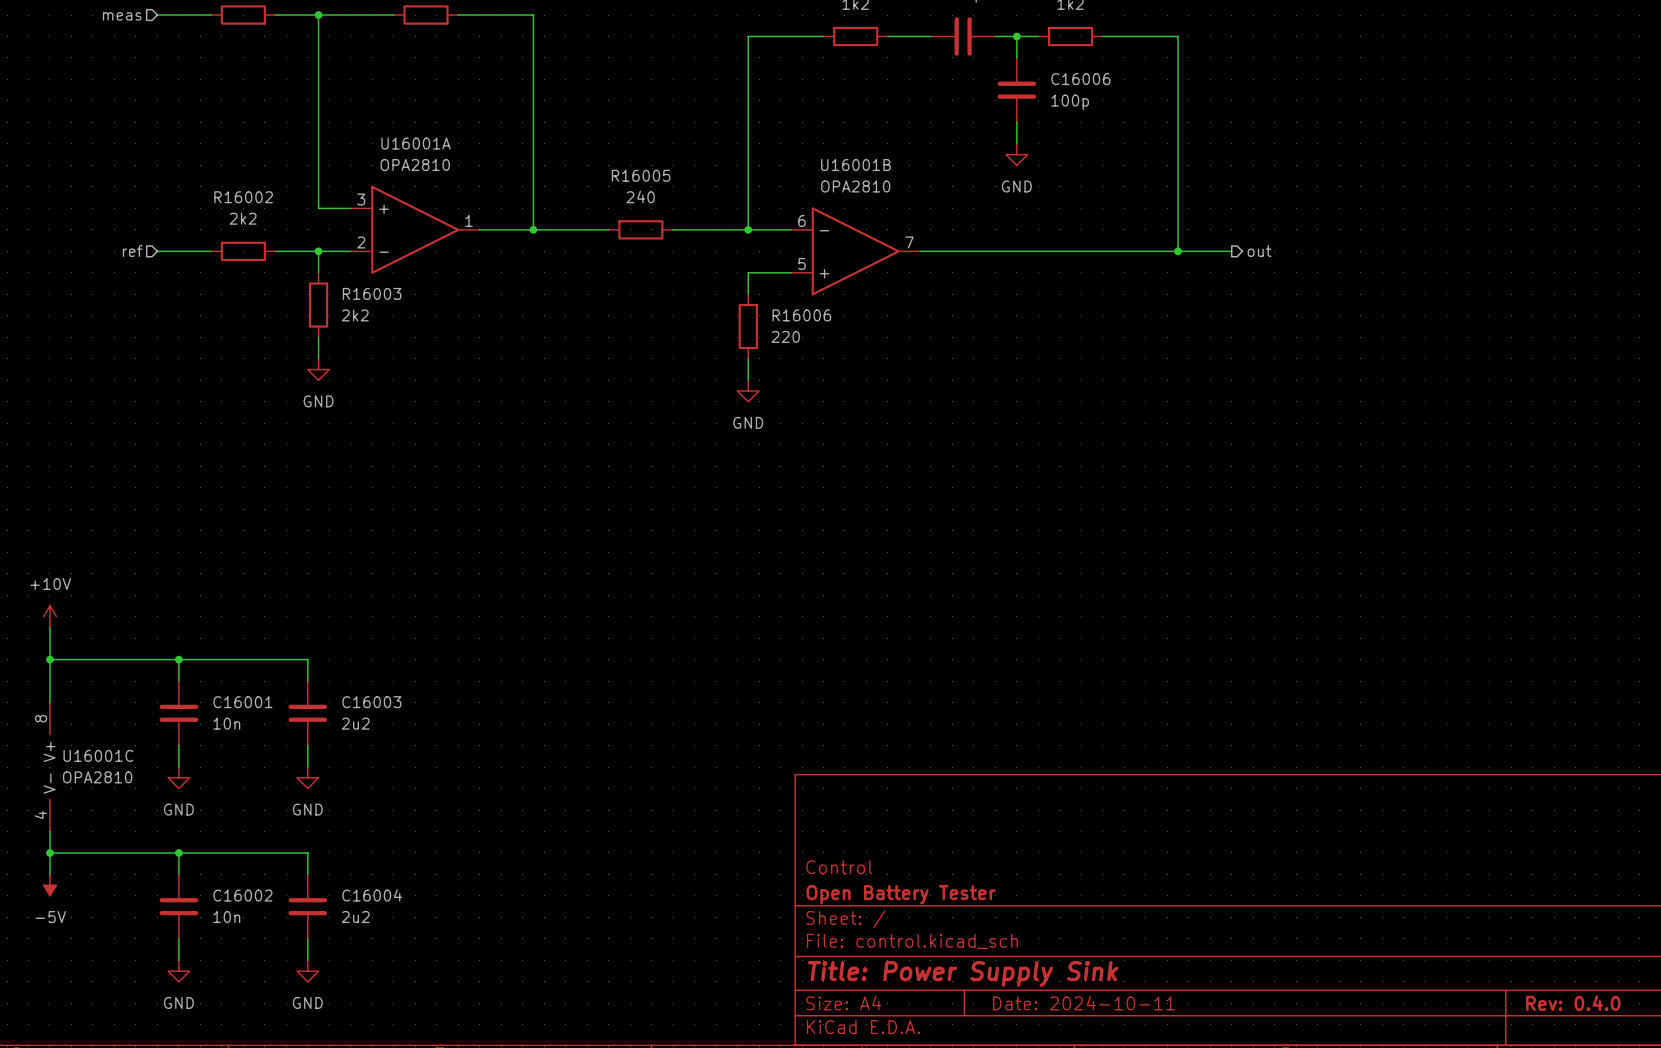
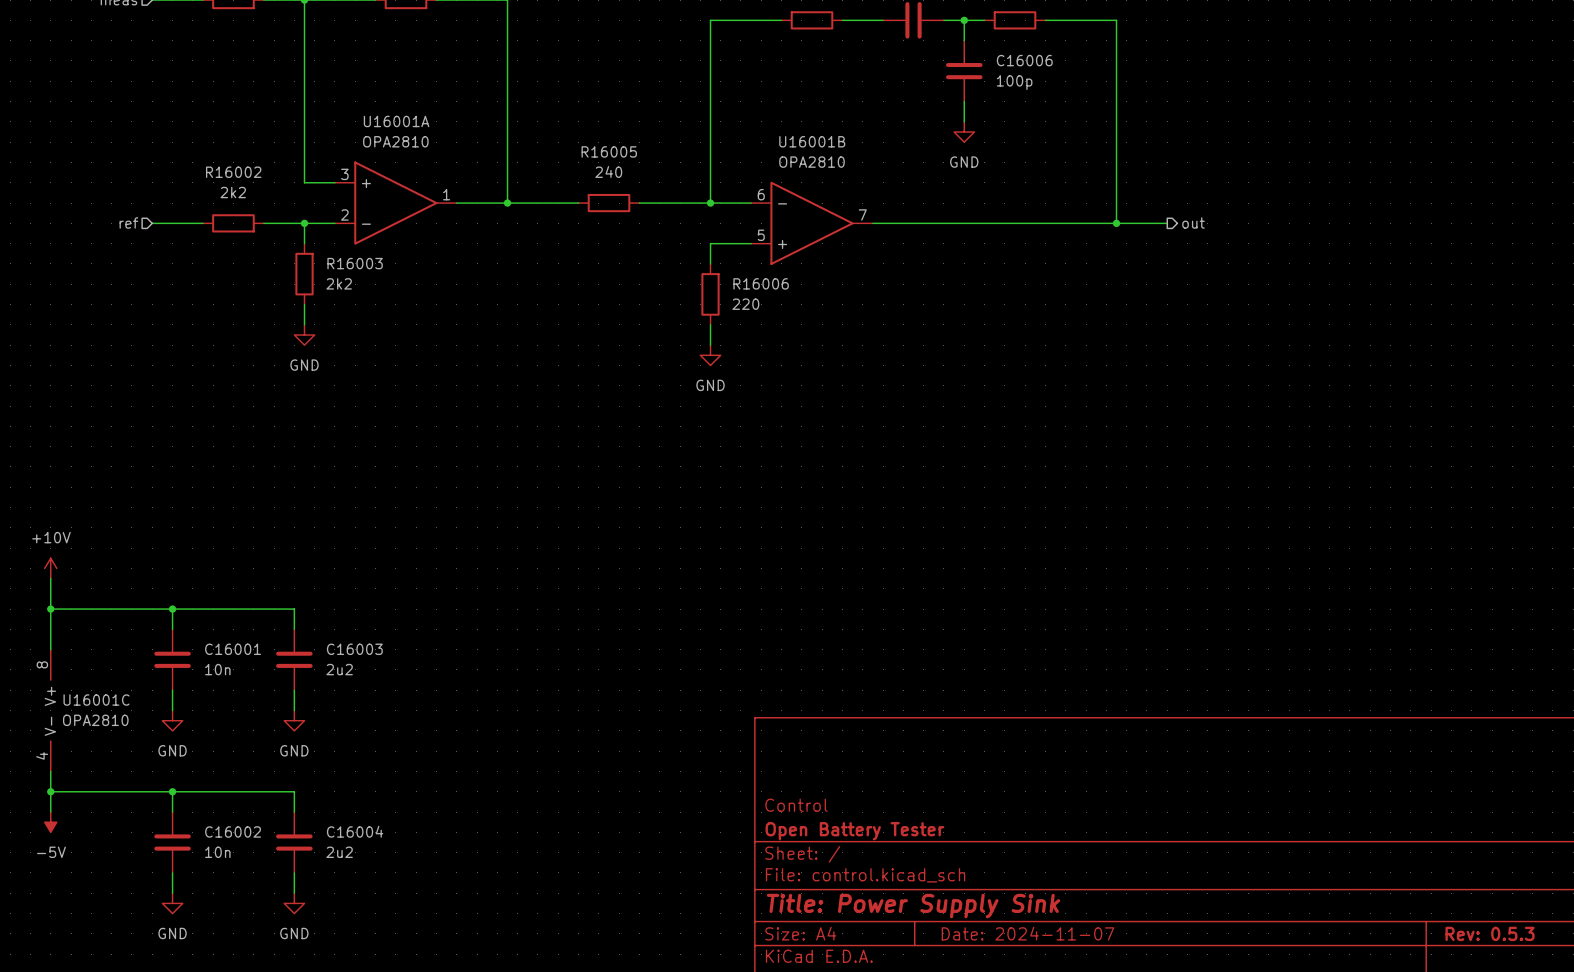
title block: Date: 2024-10-11 (1083, 1003) -> Date: 2024-11-07 (1027, 933)
title block: Rev: 0.4.0 (1573, 1003) -> Rev: 0.5.3 (1490, 933)

